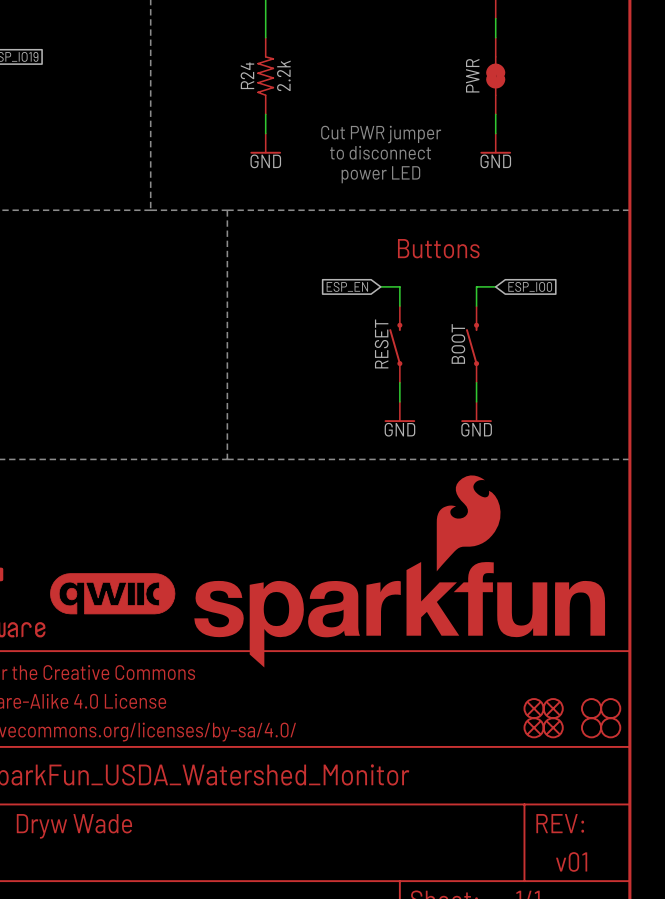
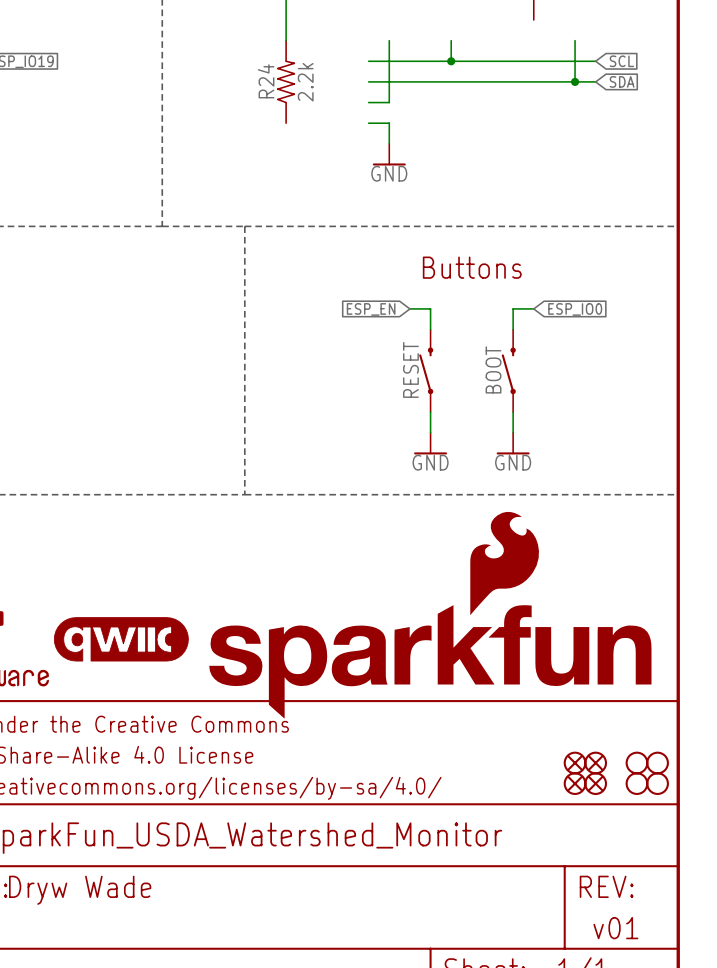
wire: (495, 18) (495, 37) -> (451, 40) (451, 61)
wire: none -> (389, 40) (389, 102) (368, 102)
wire: none -> (575, 40) (575, 81)
wire: none -> (368, 61) (595, 61)
junction: none -> (451, 61)
global label: none -> SCL (621, 61)
wire: none -> (368, 81) (595, 81)
PWR: (495, 76) -> none
junction: none -> (575, 81)
global label: none -> SDA (622, 81)
wire: (265, 114) (265, 133) -> none
wire: none -> (368, 123) (389, 123) (389, 143)
wire: (495, 114) (495, 133) -> none
text: Cut PWR jumper (381, 134) -> none
power symbol: GND (265, 143) -> none
power symbol: none -> GND (389, 154)
power symbol: GND (495, 143) -> none
text: to disconnect (380, 152) -> none
text: power LED (380, 174) -> none

